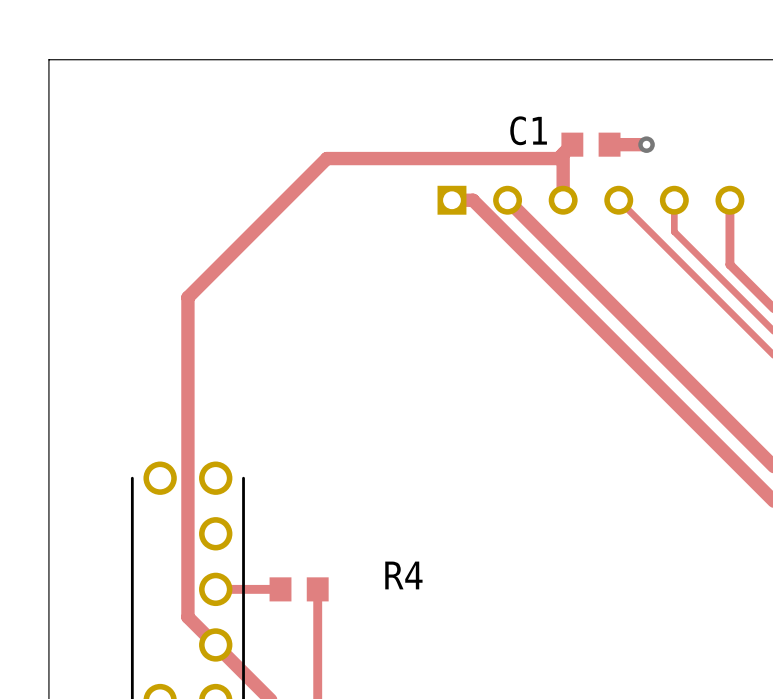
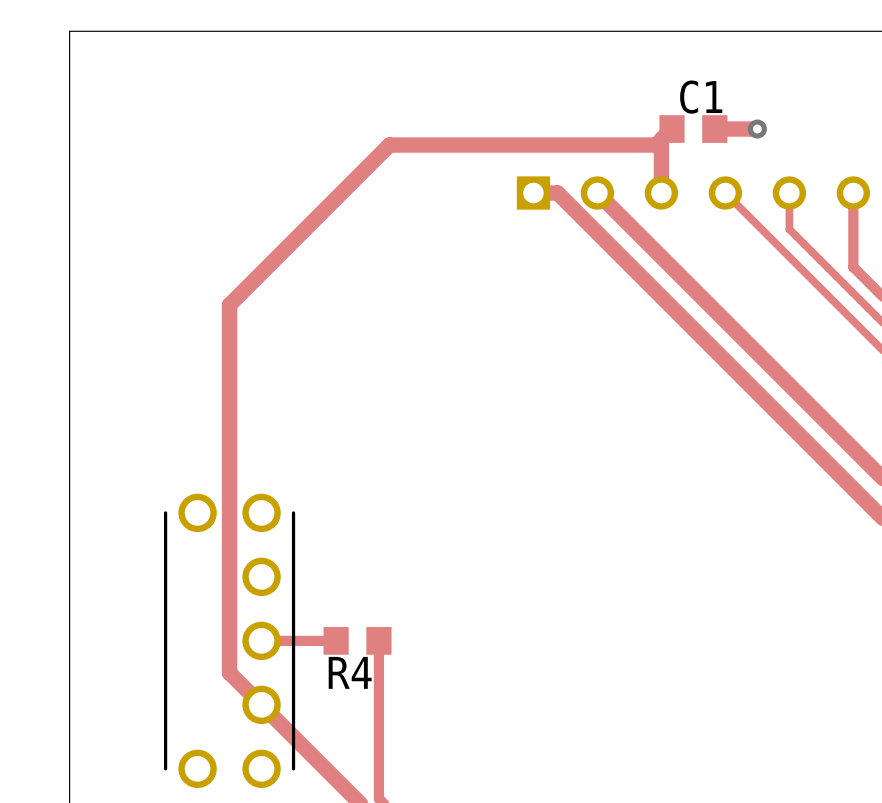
C1 name position: C1 (528, 130) -> C1 (701, 97)
R4 name position: R4 (403, 575) -> R4 (350, 672)

